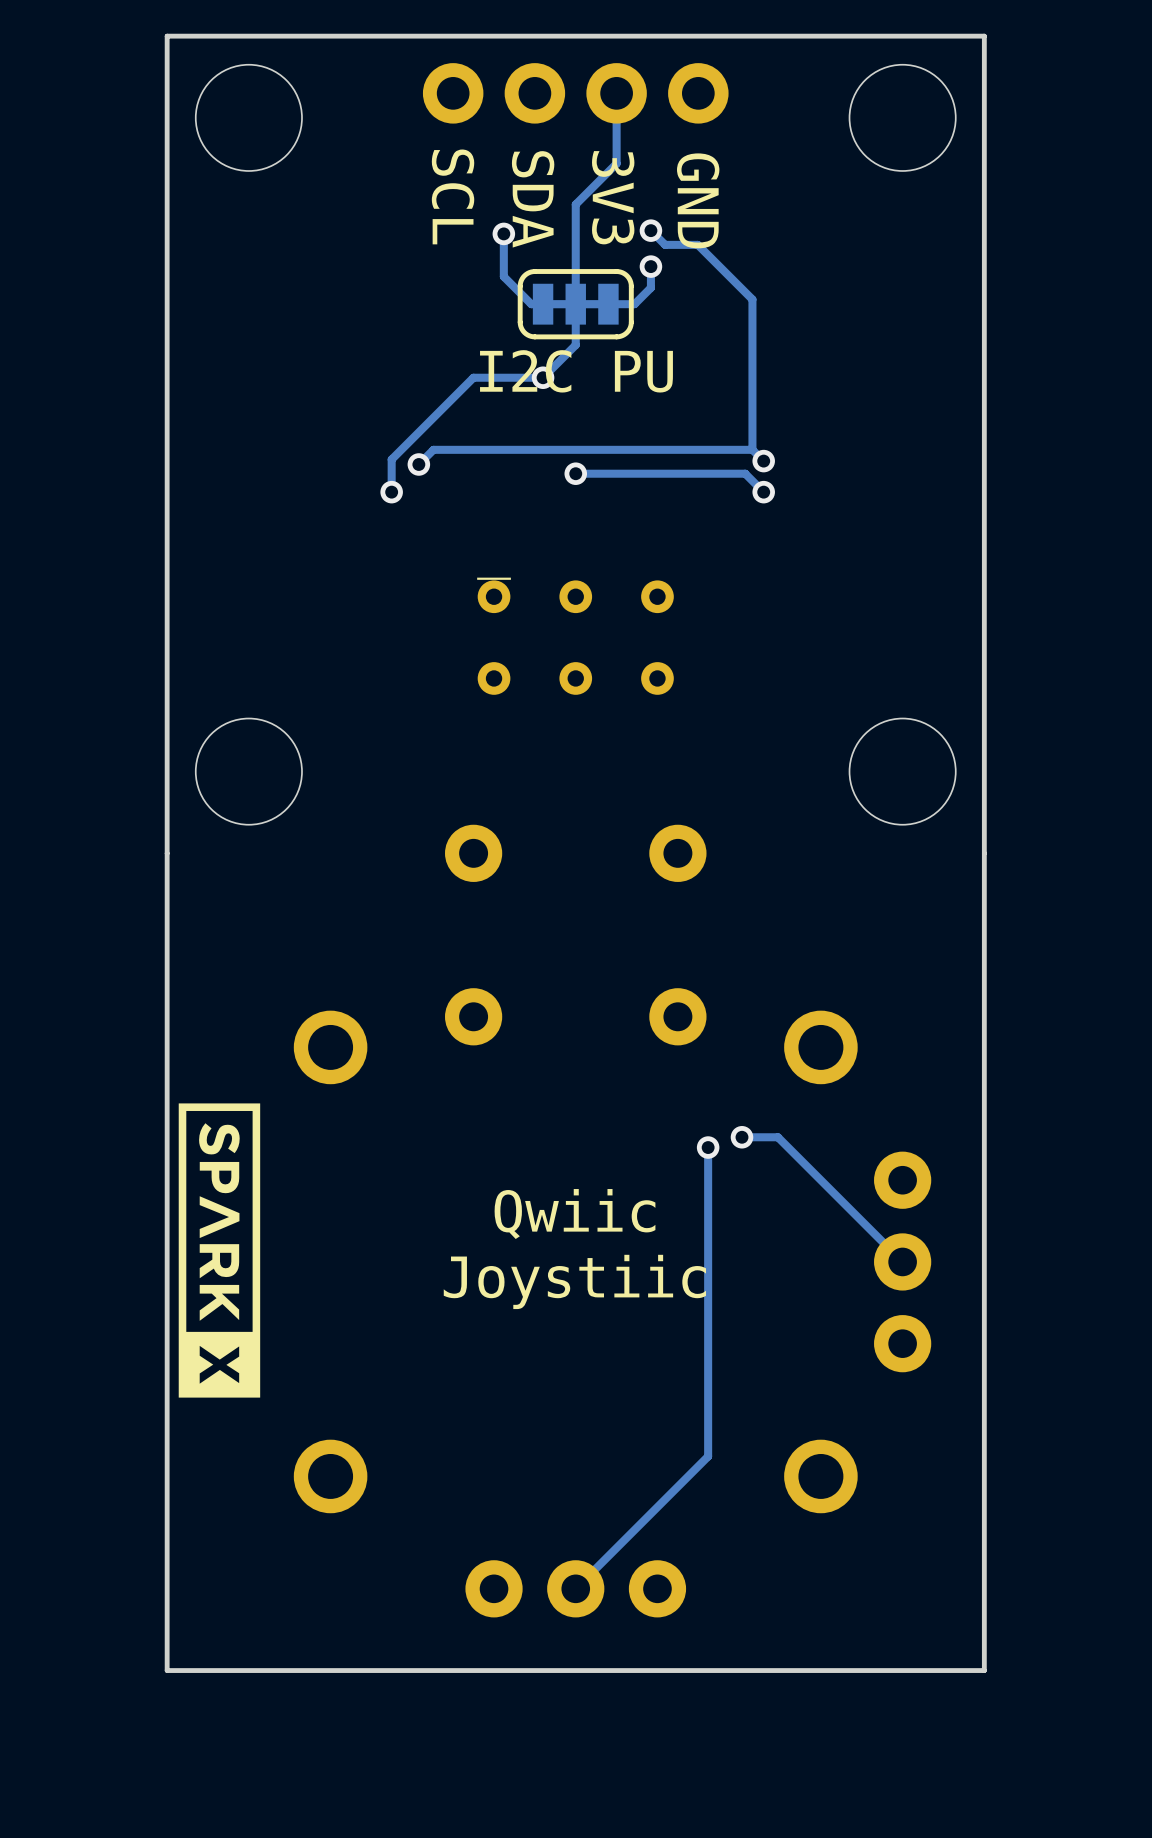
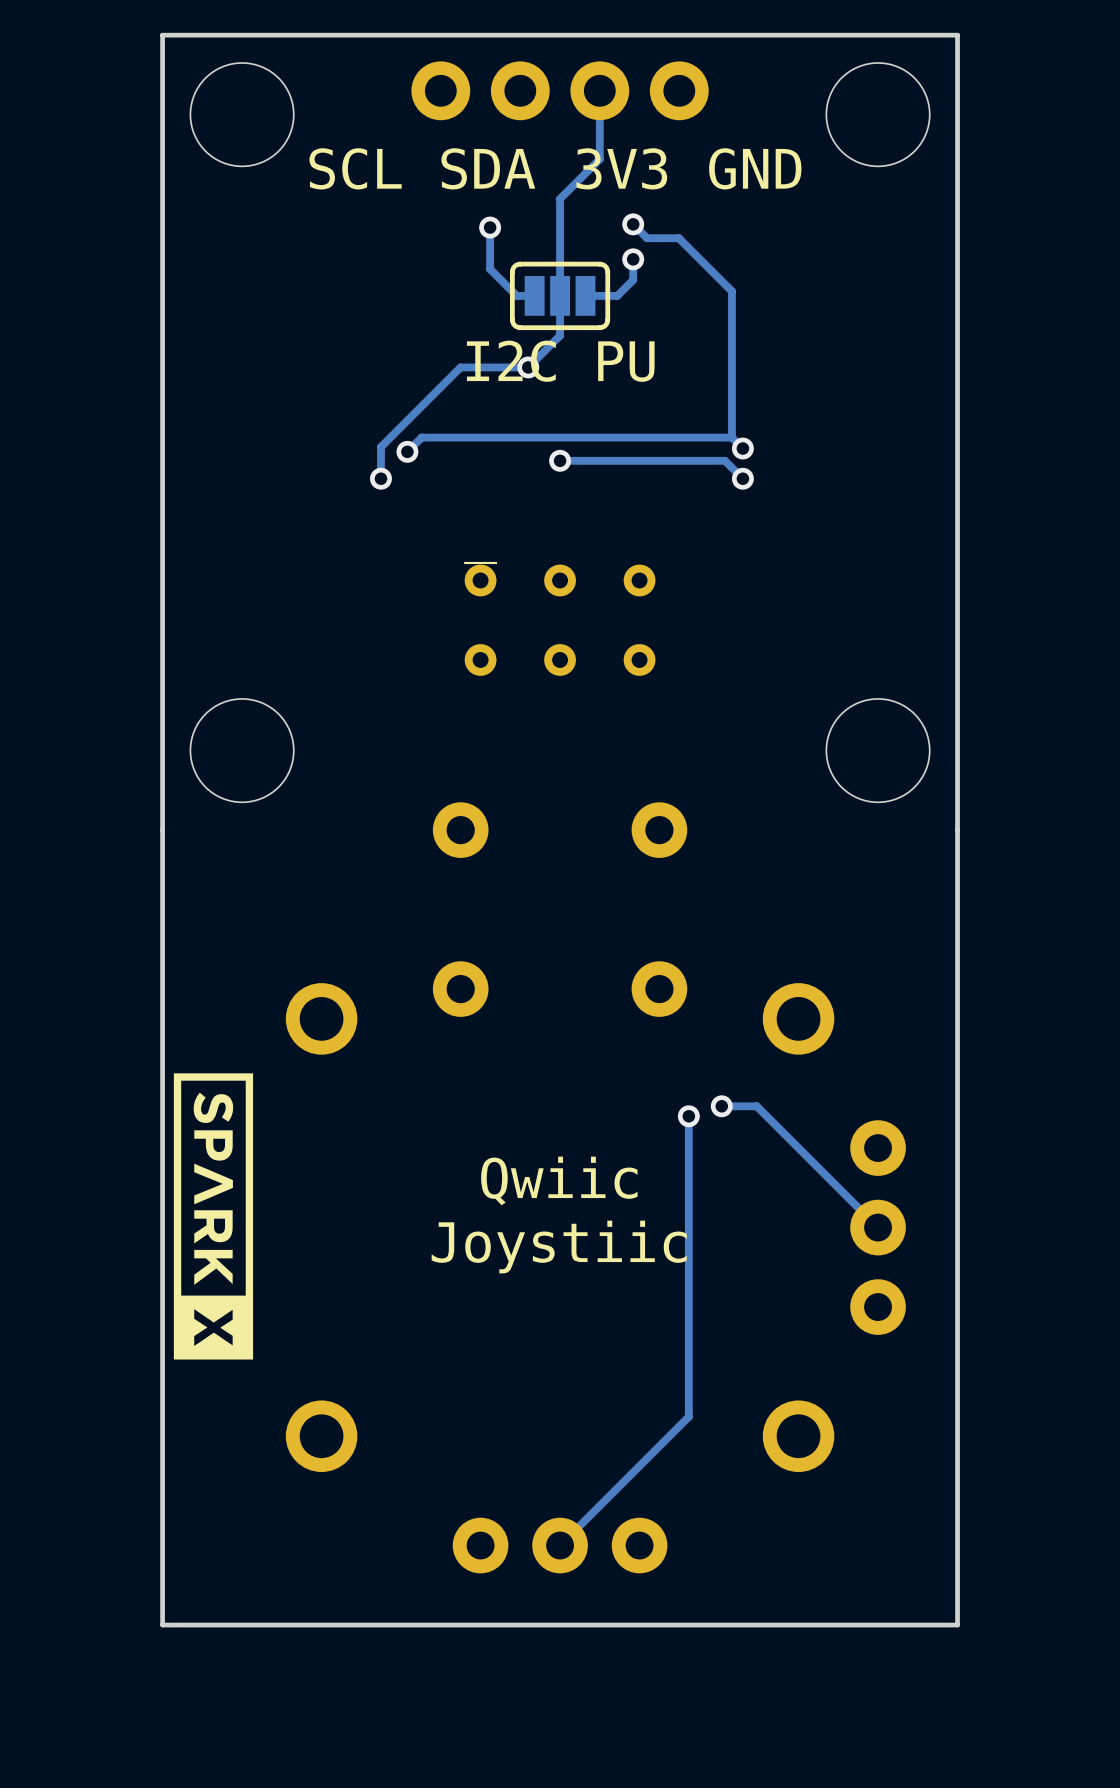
text rotation: 0° (453, 196) -> 90° counterclockwise (355, 168)
text rotation: 0° (613, 197) -> 90° counterclockwise (621, 168)
text rotation: 0° (533, 199) -> 90° counterclockwise (488, 168)
text rotation: 0° (698, 200) -> 90° counterclockwise (755, 168)
part footprint: [517, 269, 634, 340] -> [509, 261, 611, 331]

